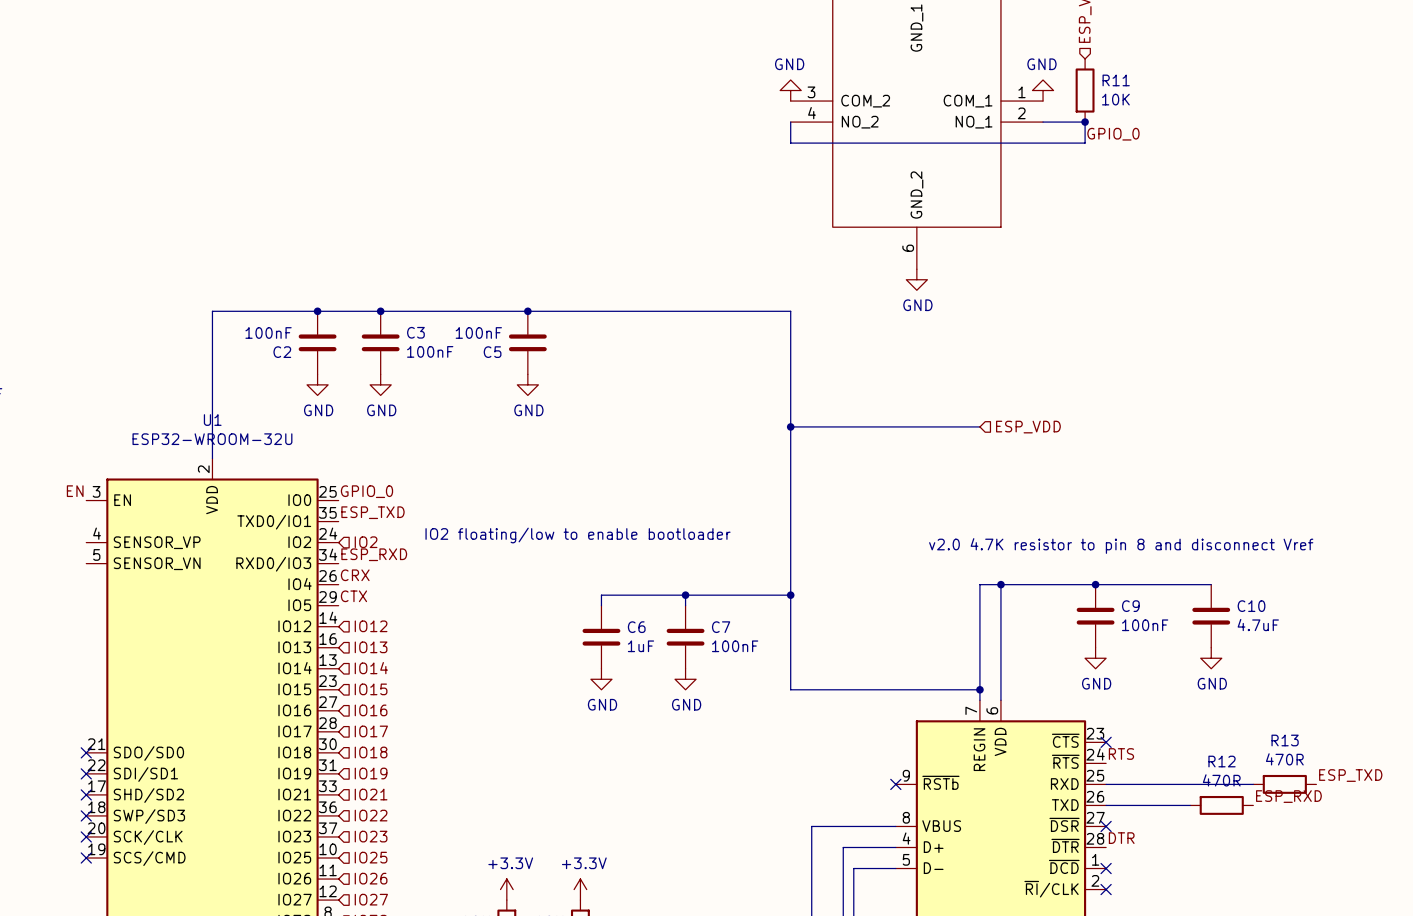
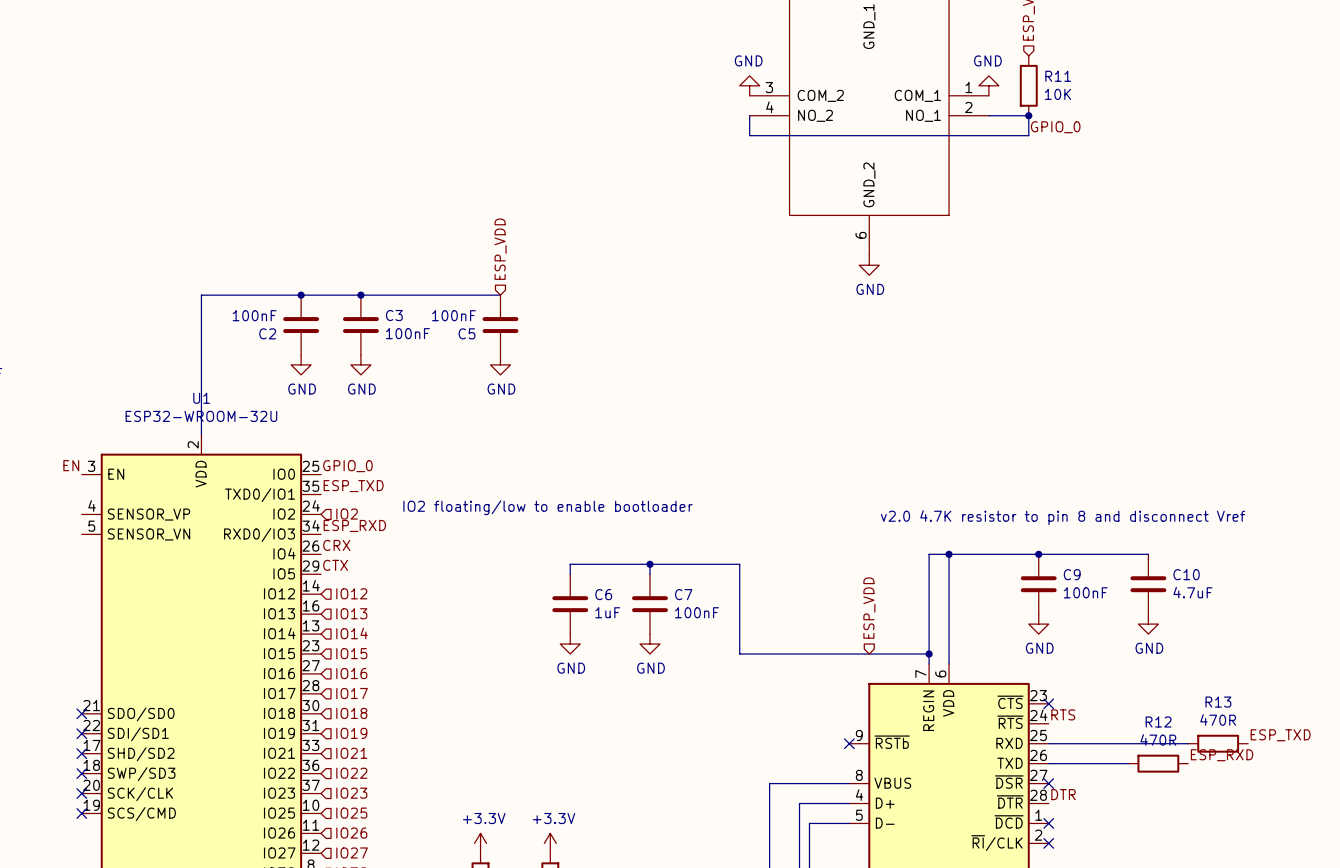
hierarchical label: none -> ESP_VDD (500, 249)
wire: (527, 311) (790, 311) (790, 689) -> none
junction: (527, 311) -> none
wire: (790, 426) (979, 426) -> none
junction: (790, 426) -> none
hierarchical label: ESP_VDD (1028, 427) -> none
wire: (780, 595) (790, 595) -> (739, 564) (739, 654) (749, 654)
junction: (790, 595) -> none
hierarchical label: none -> ESP_VDD (869, 608)

